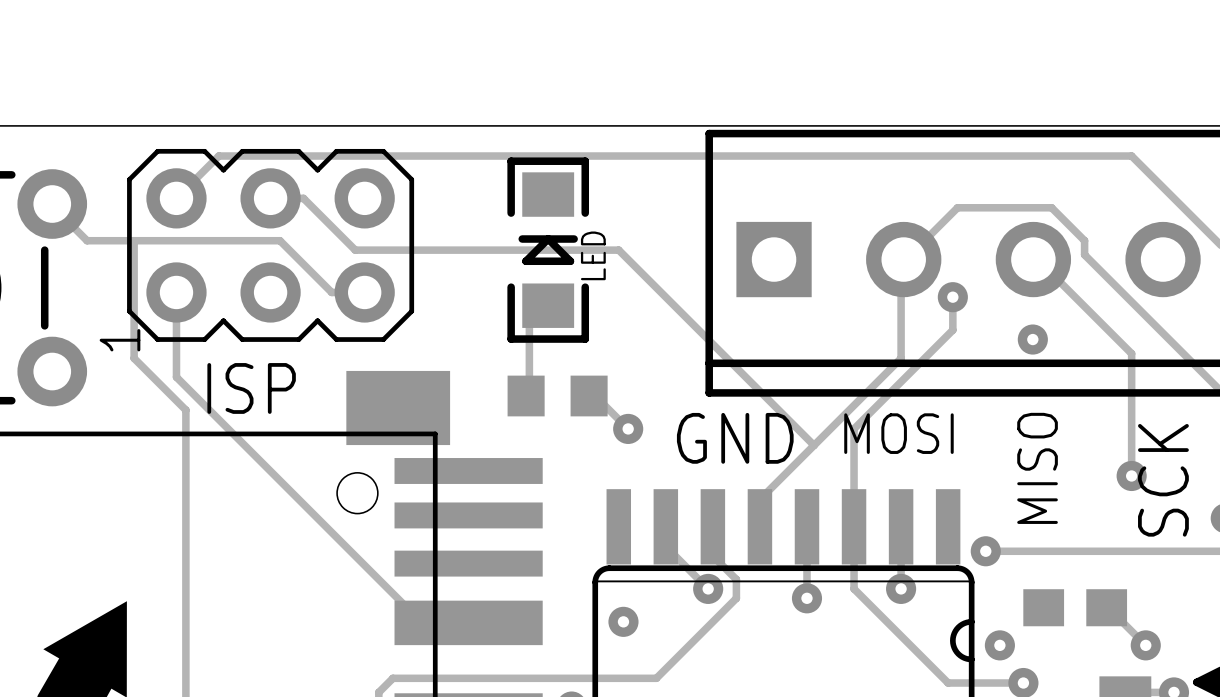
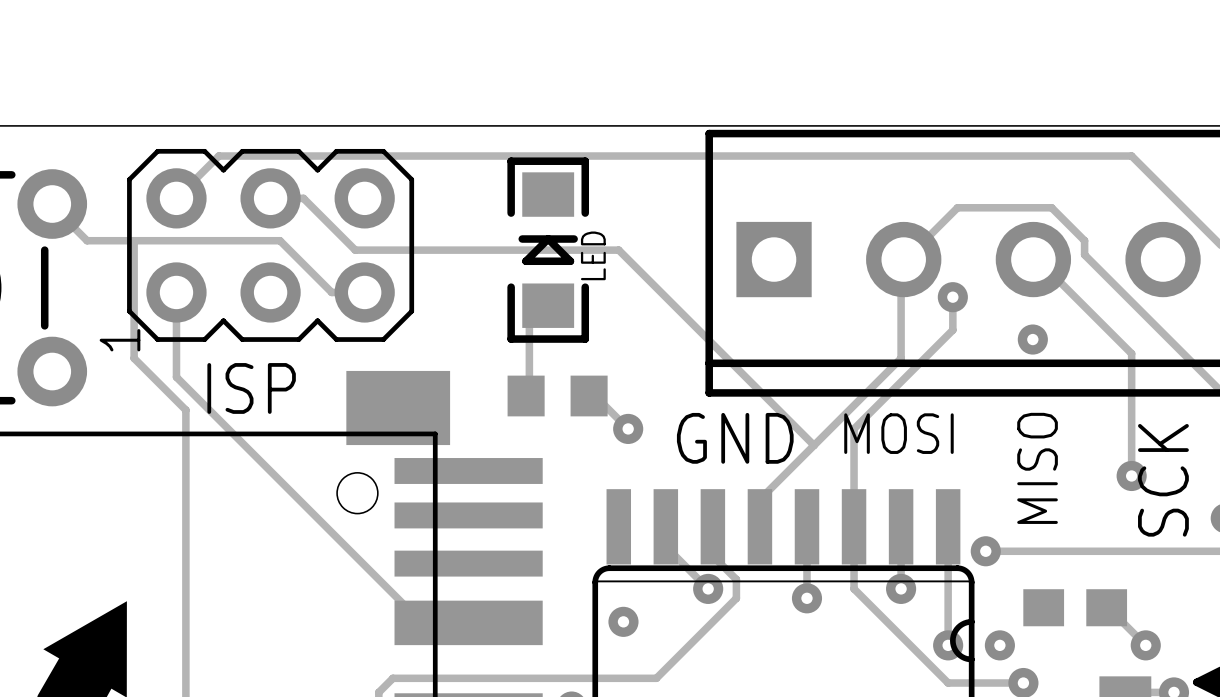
track: none -> (948, 526) (948, 645)
via: none -> (948, 645)

